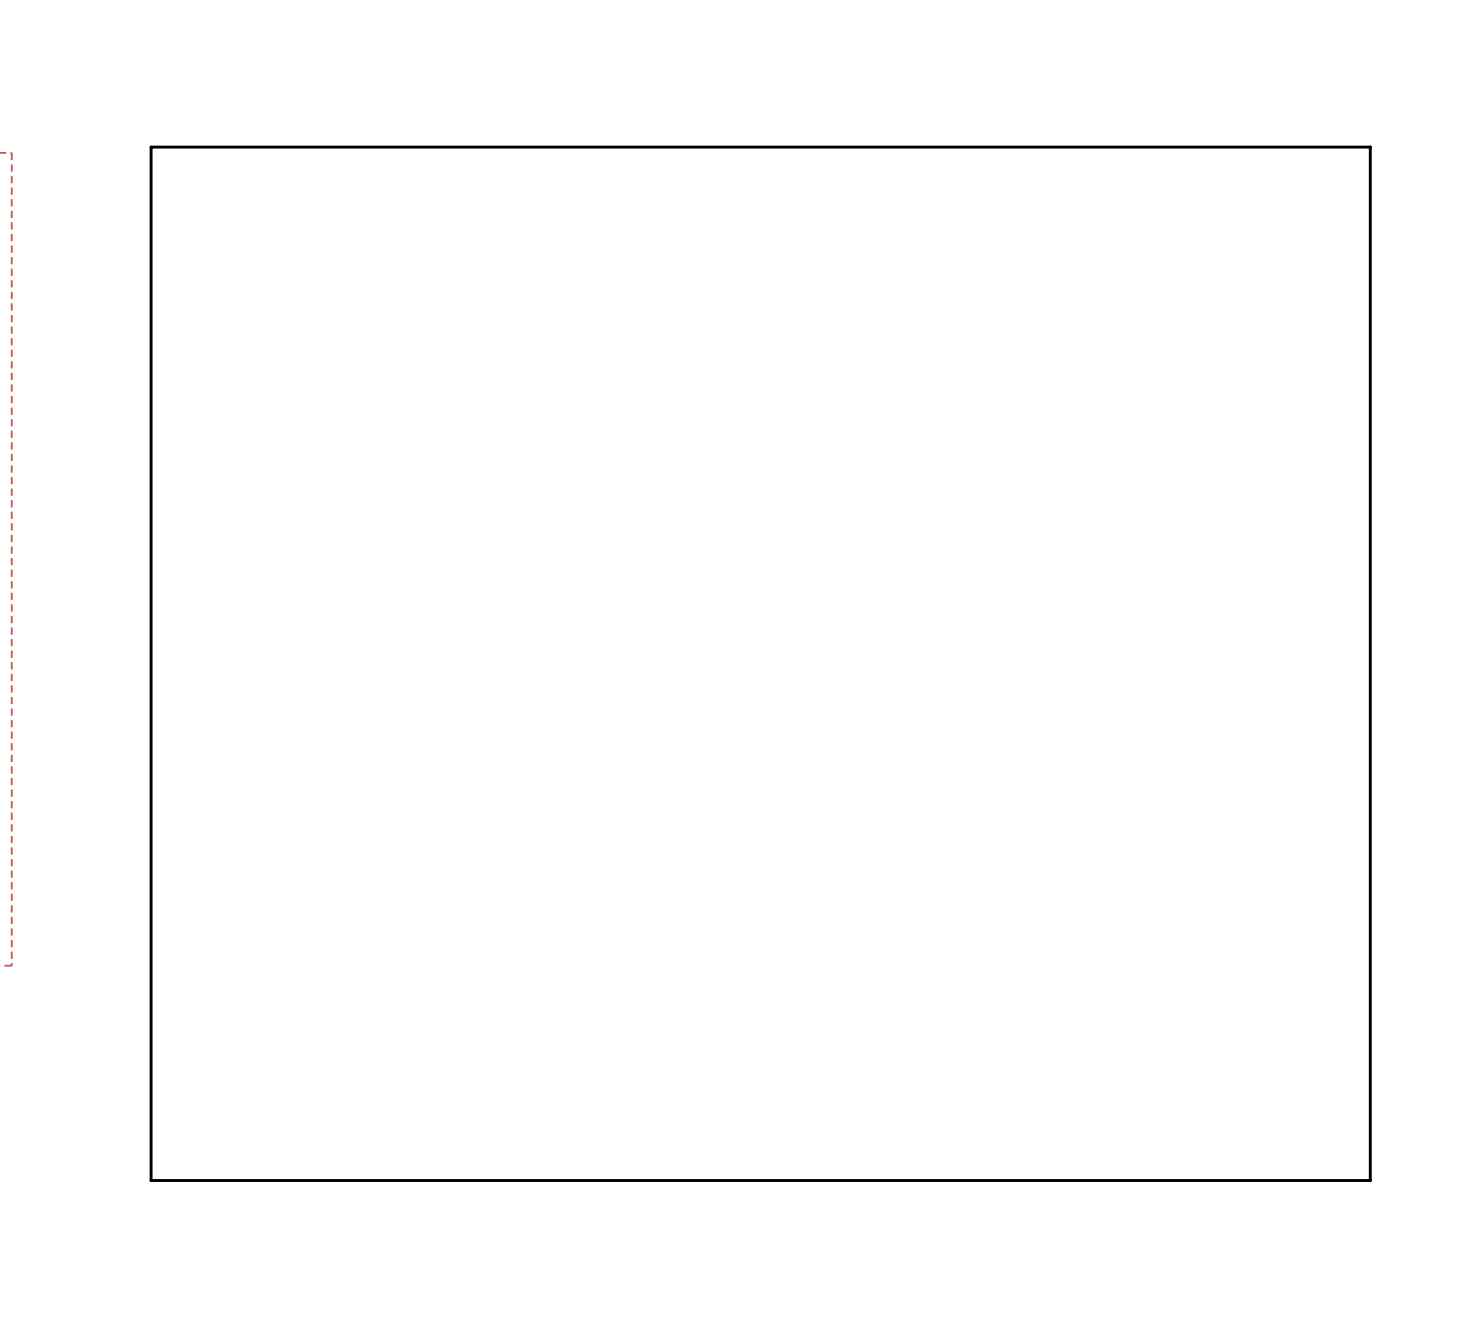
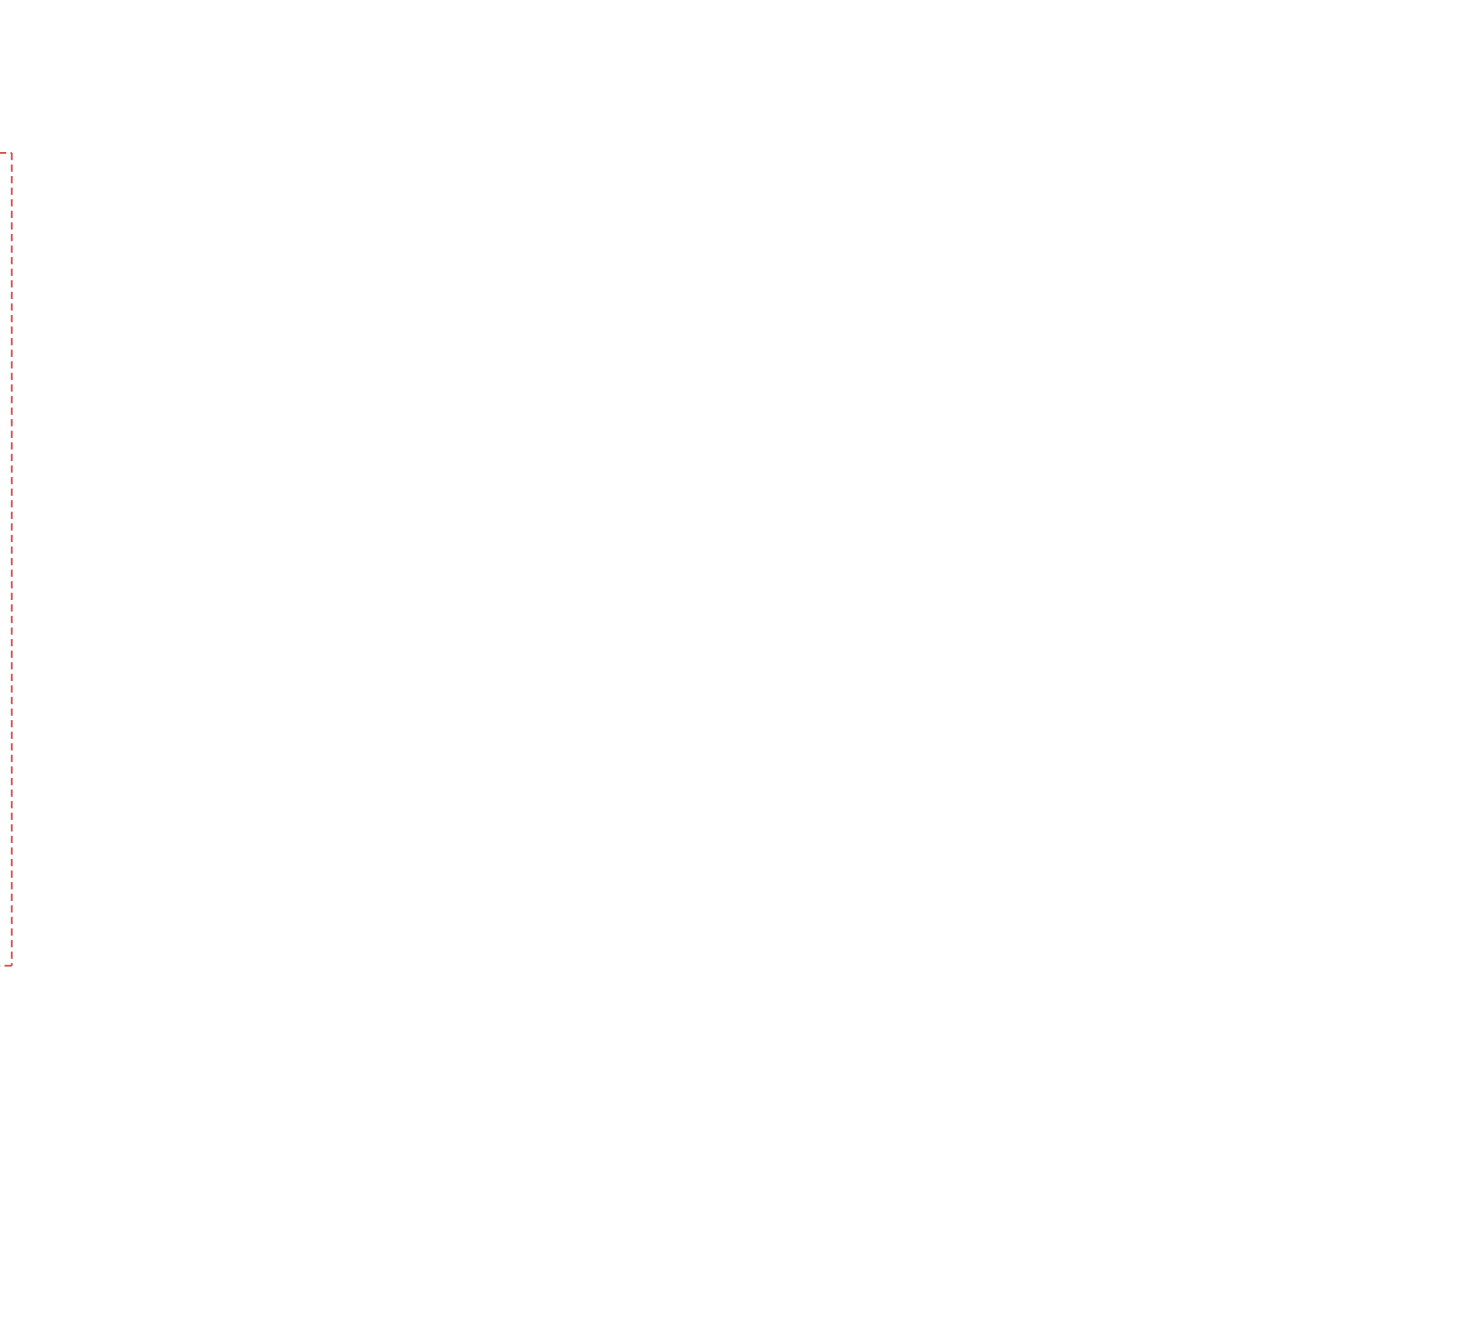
board edge: (151, 147) (1370, 147) (1370, 1180) (151, 1180) (151, 147) -> none

